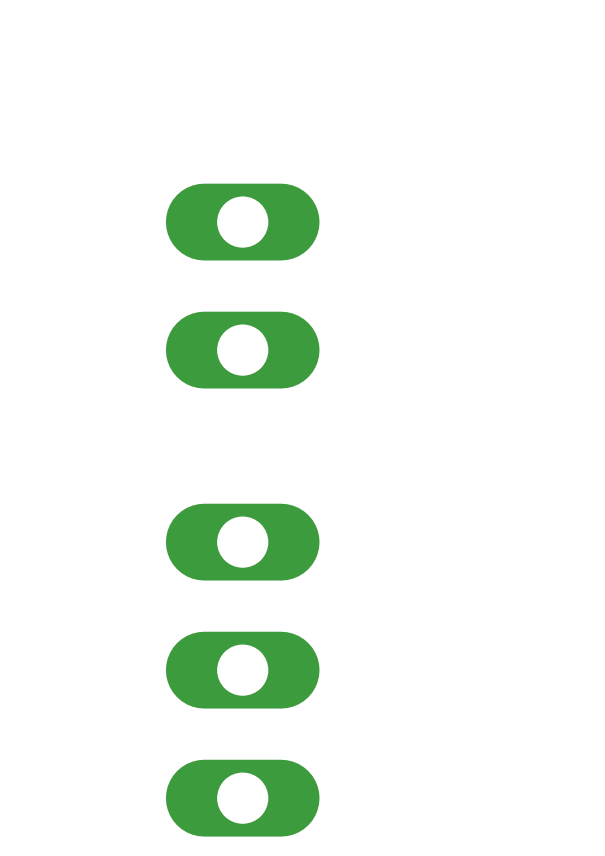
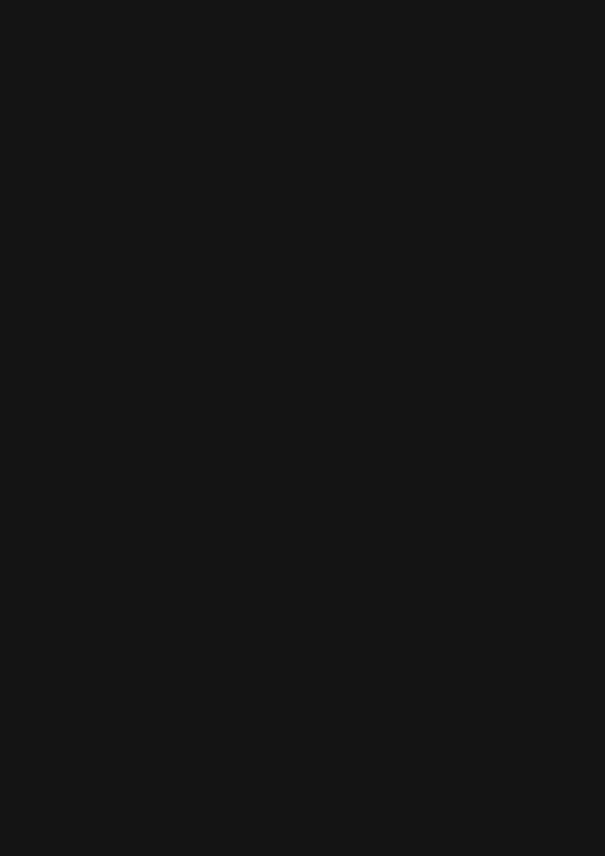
part: (242, 286) -> none
part: (242, 670) -> none

